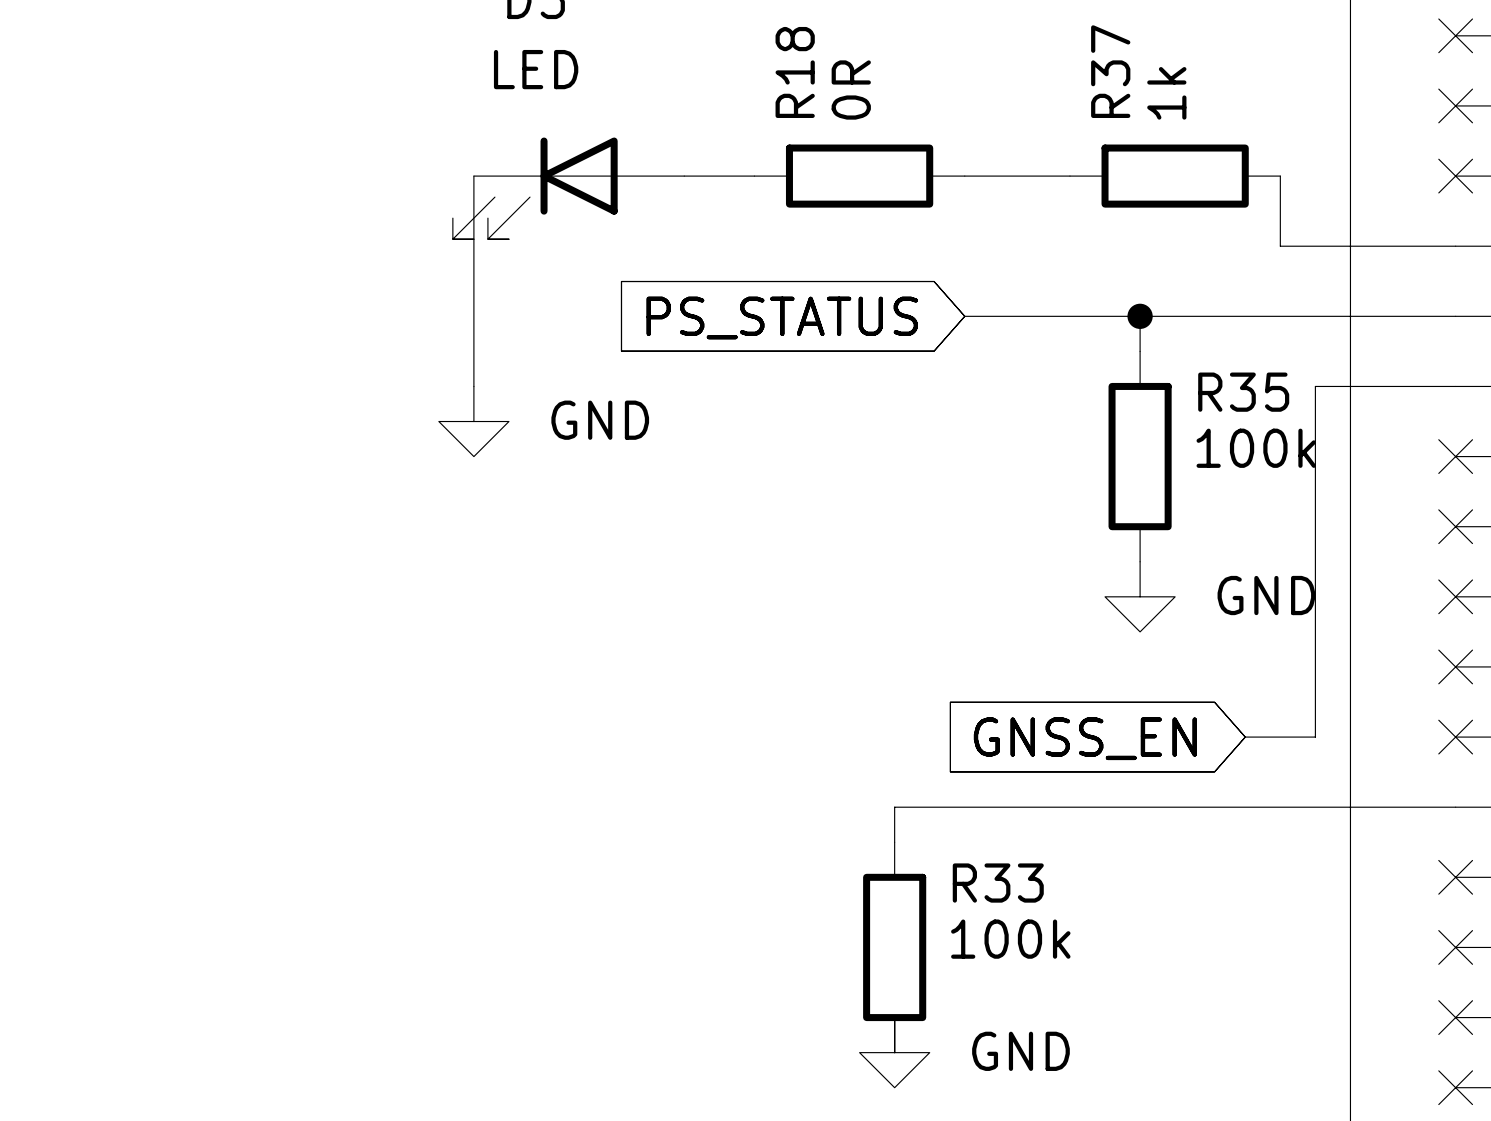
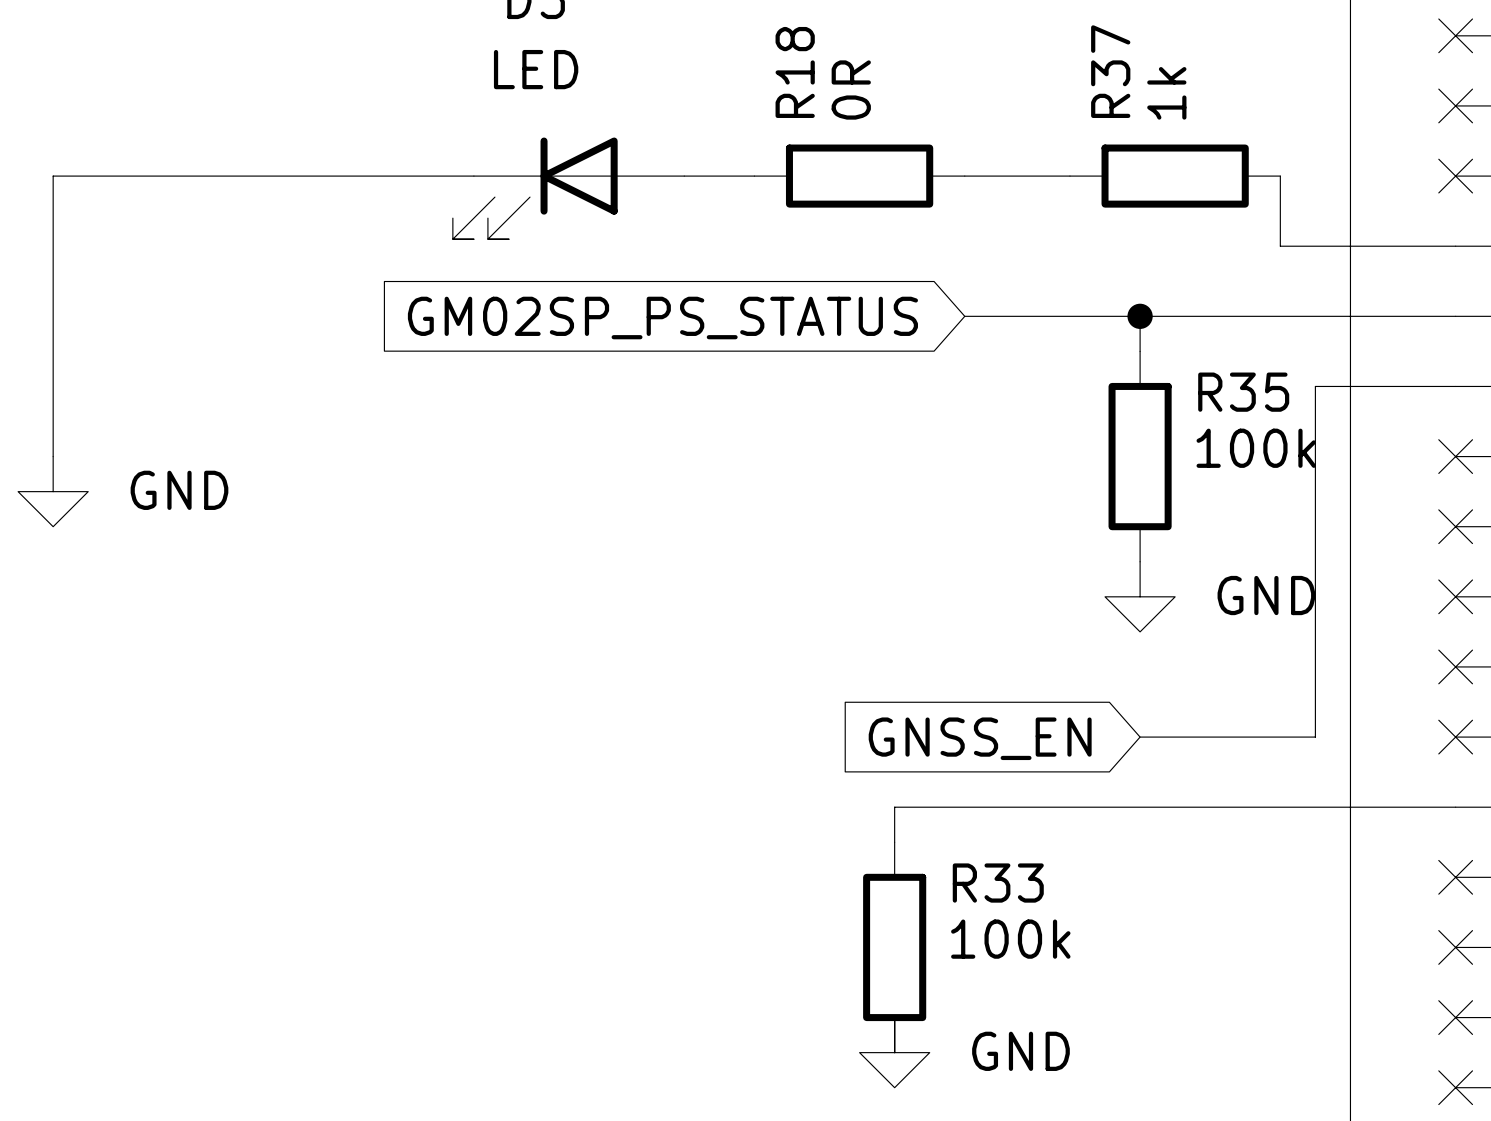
wire: (473, 176) (473, 386) -> (473, 176) (53, 176) (53, 456)
global label: PS_STATUS (782, 318) -> GM02SP_PS_STATUS (662, 318)
power symbol position: GND (473, 421) -> GND (53, 491)
wire: none -> (1140, 737) (1245, 737)
global label position: GNSS_EN (1085, 738) -> GNSS_EN (980, 738)

